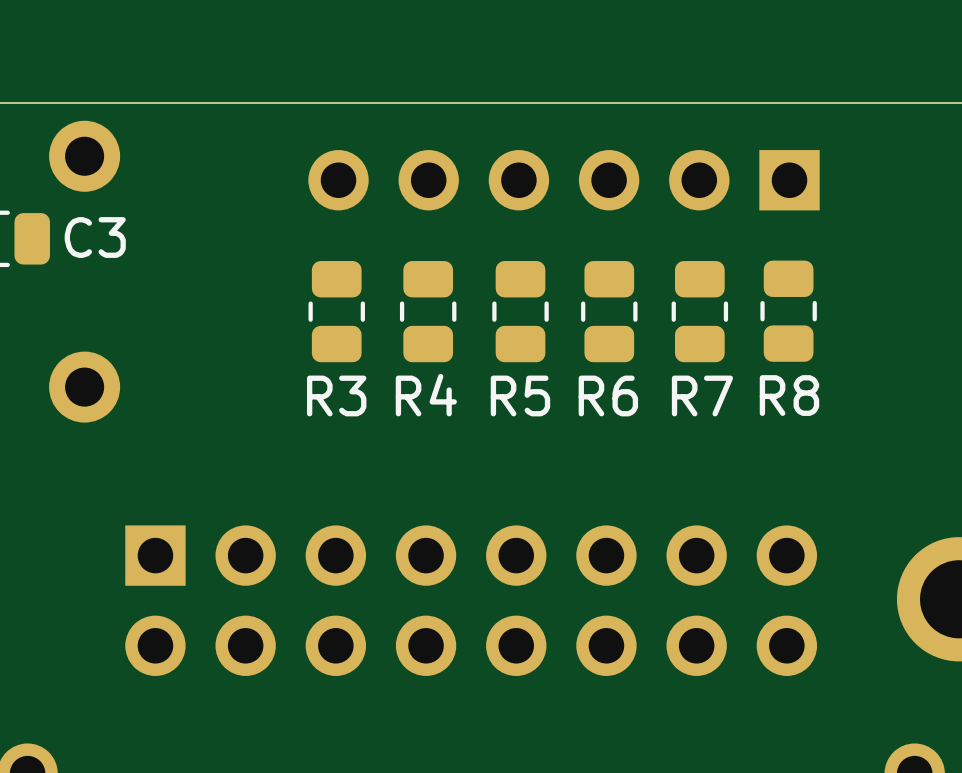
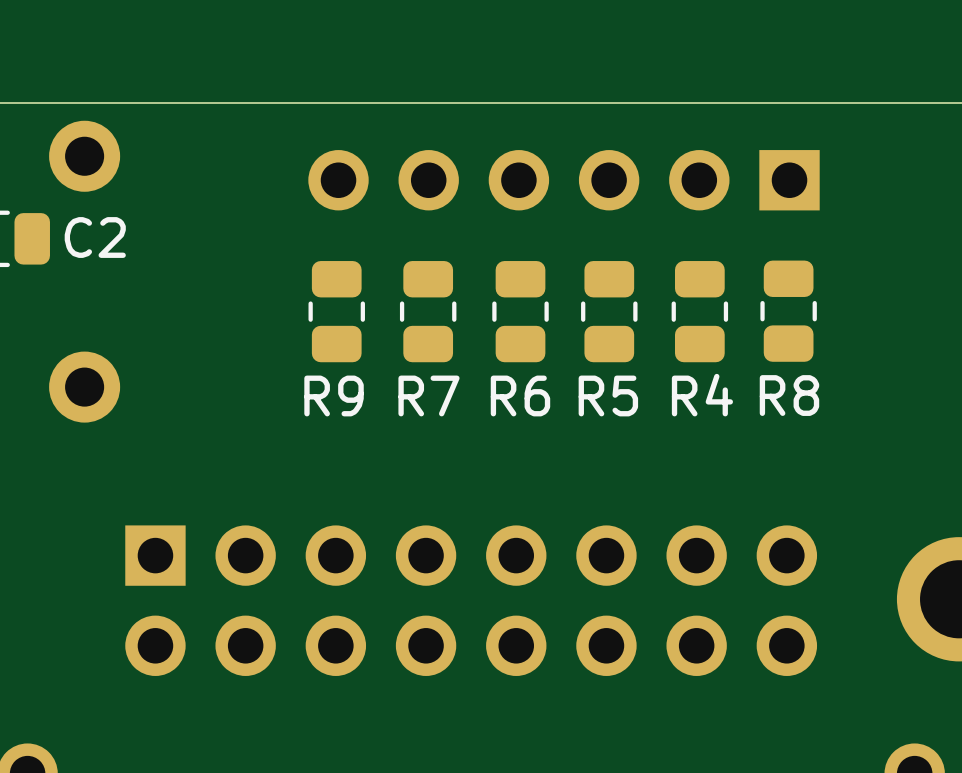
C3 name: C3 (95, 237) -> C2 (95, 237)
R3 name: R3 (336, 395) -> R9 (334, 395)
R4 name: R4 (426, 395) -> R7 (428, 395)
R5 name: R5 (520, 395) -> R6 (520, 395)
R6 name: R6 (608, 395) -> R5 (608, 395)
R7 name: R7 (702, 395) -> R4 (702, 395)

